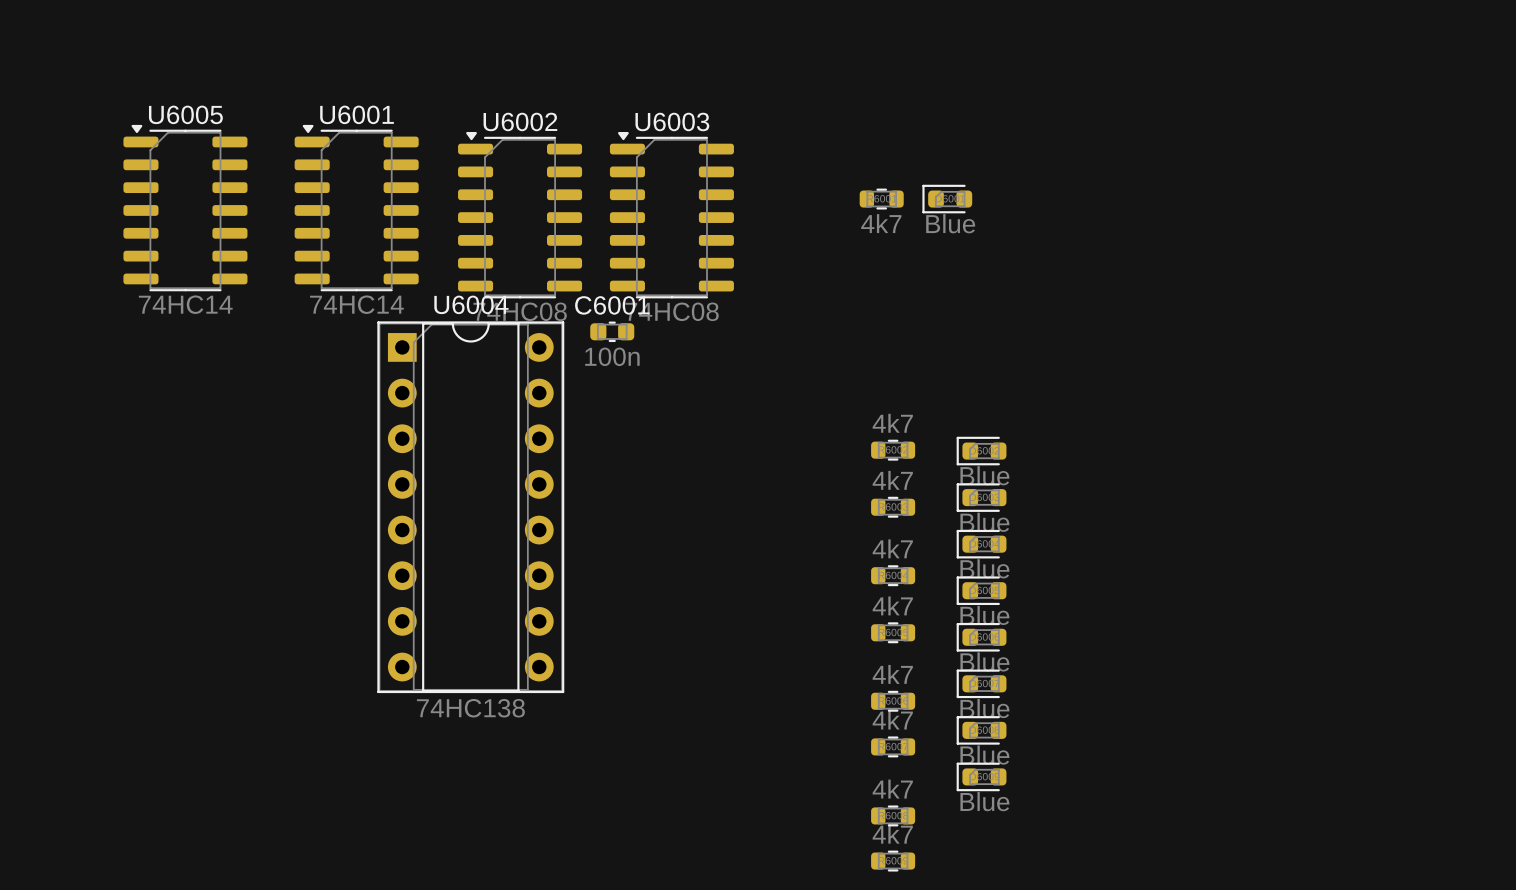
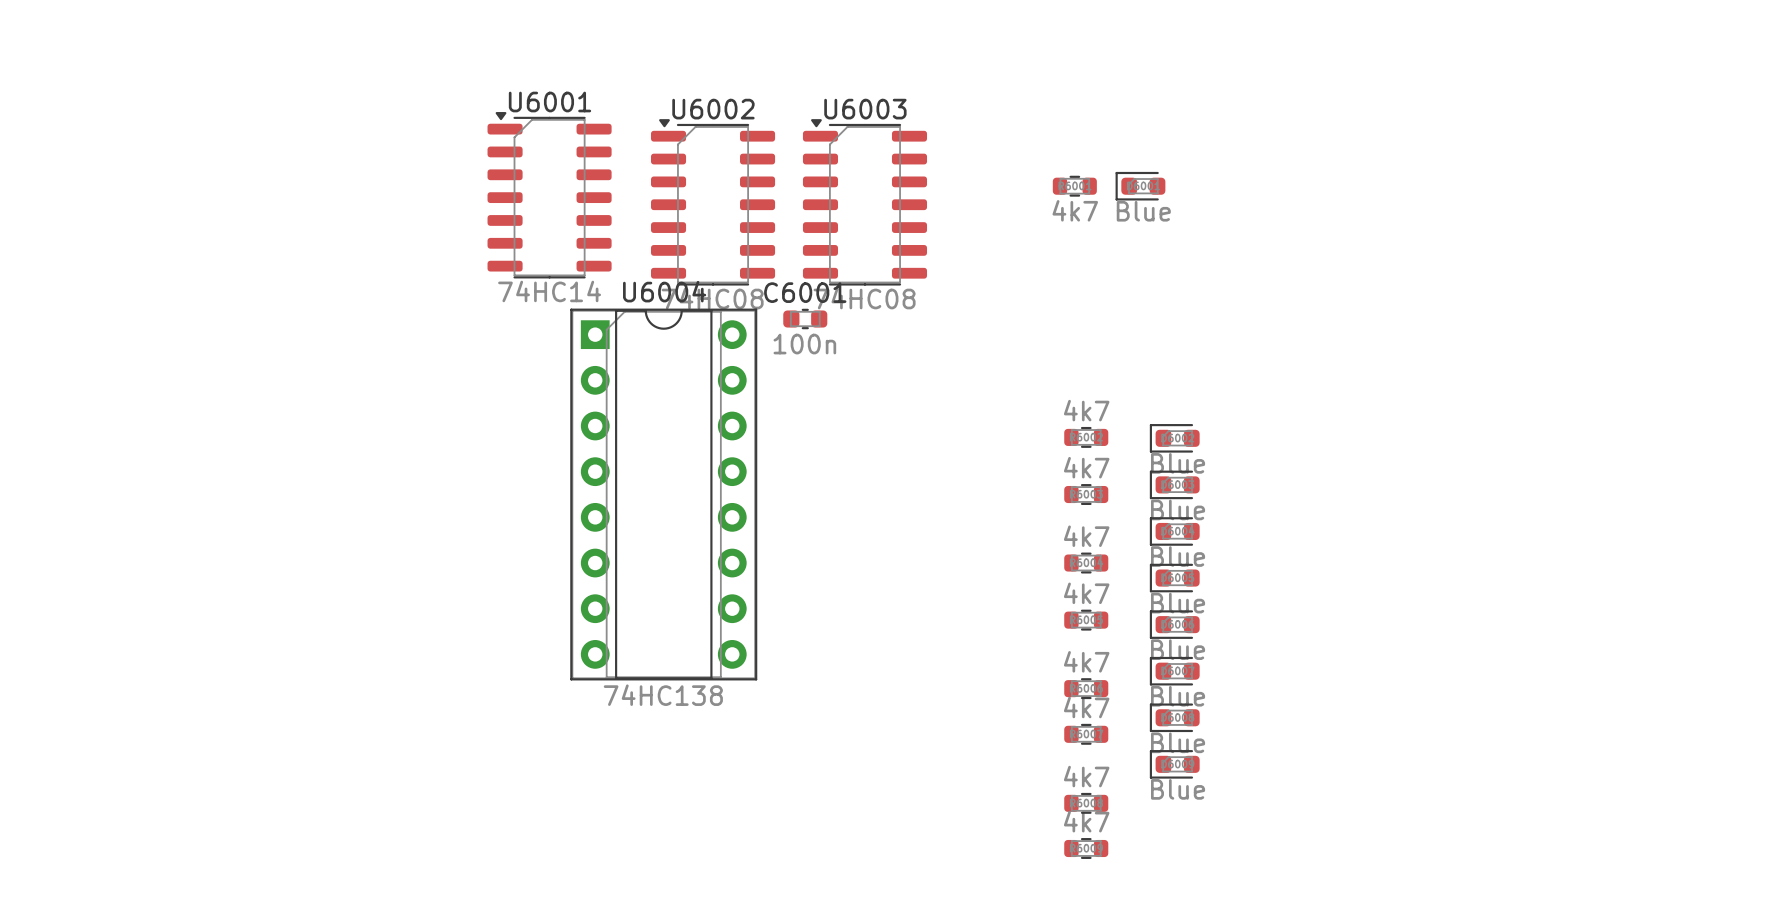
U6005: 74HC14 (185, 208) -> none

